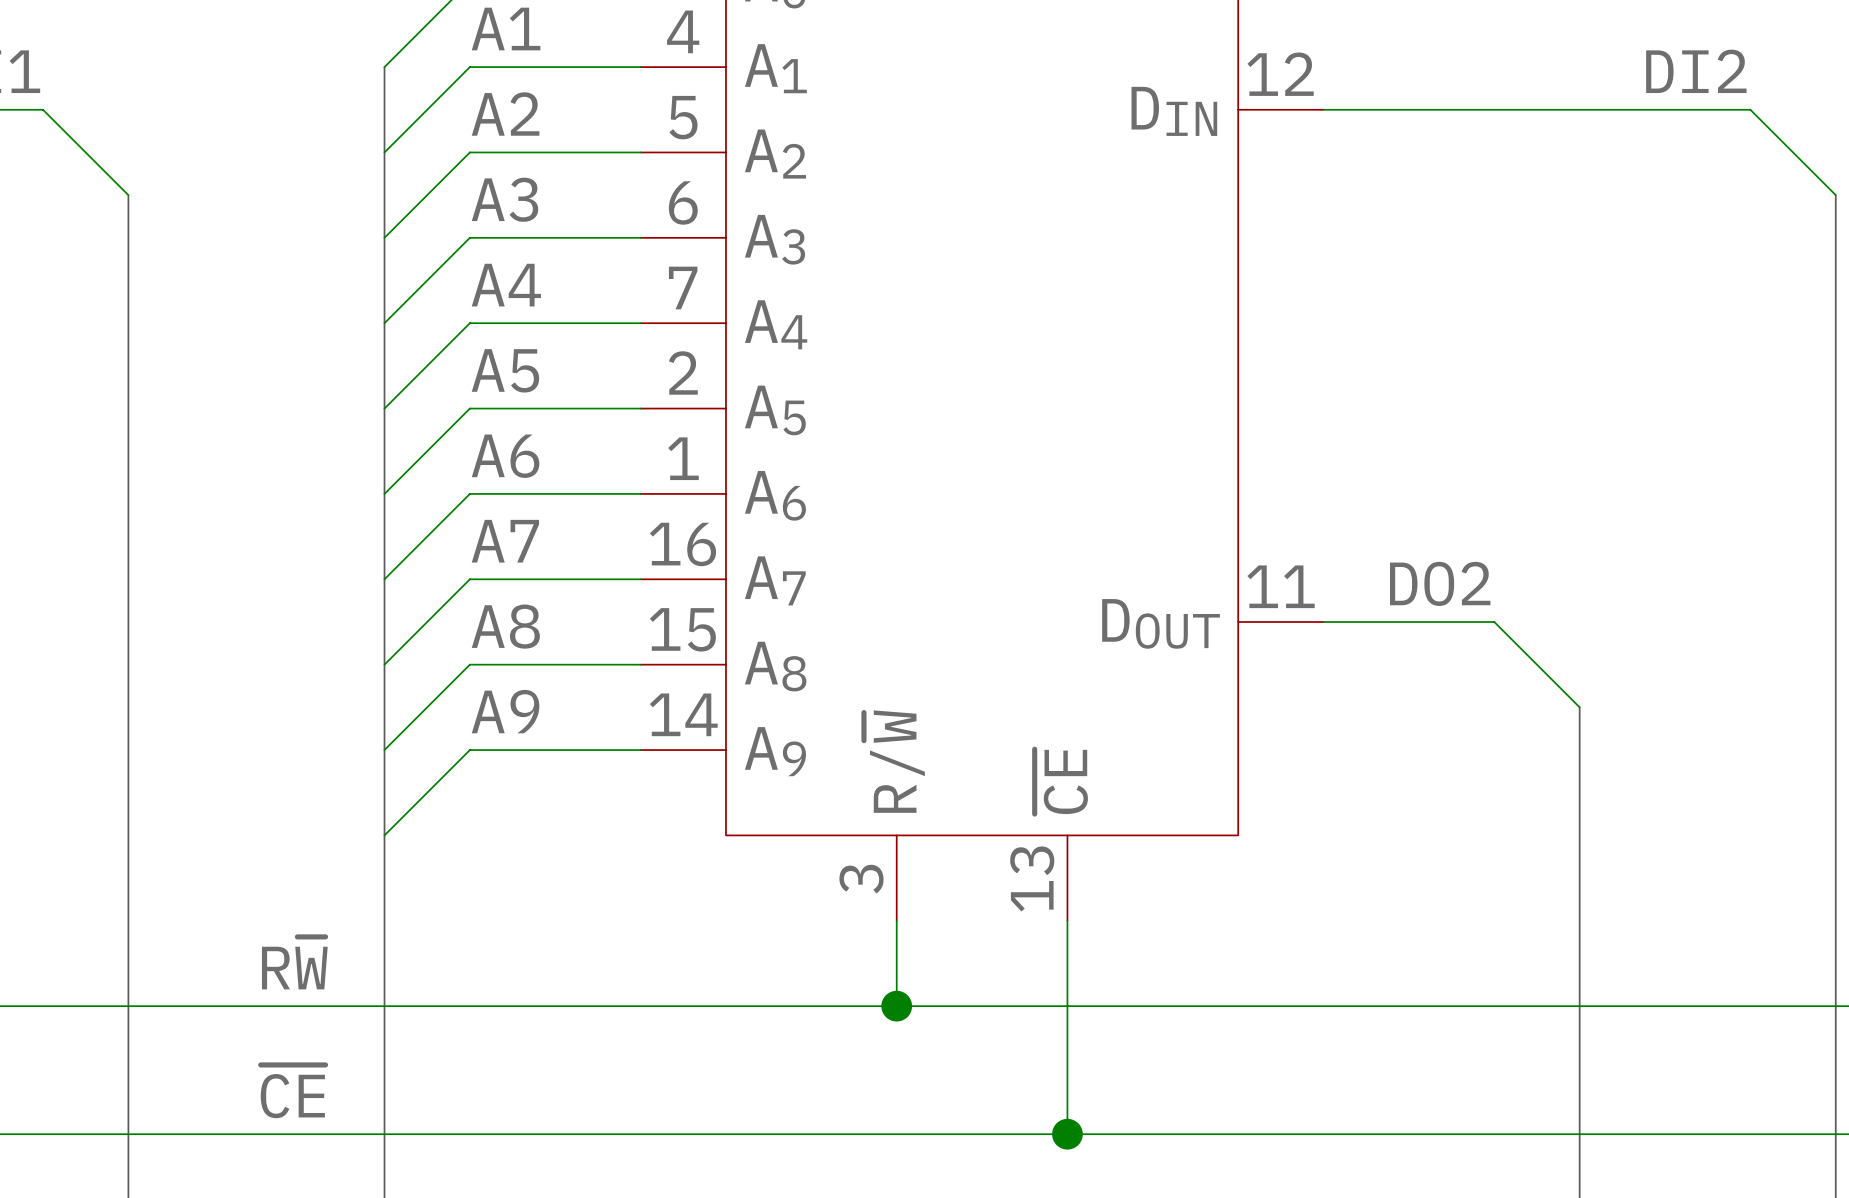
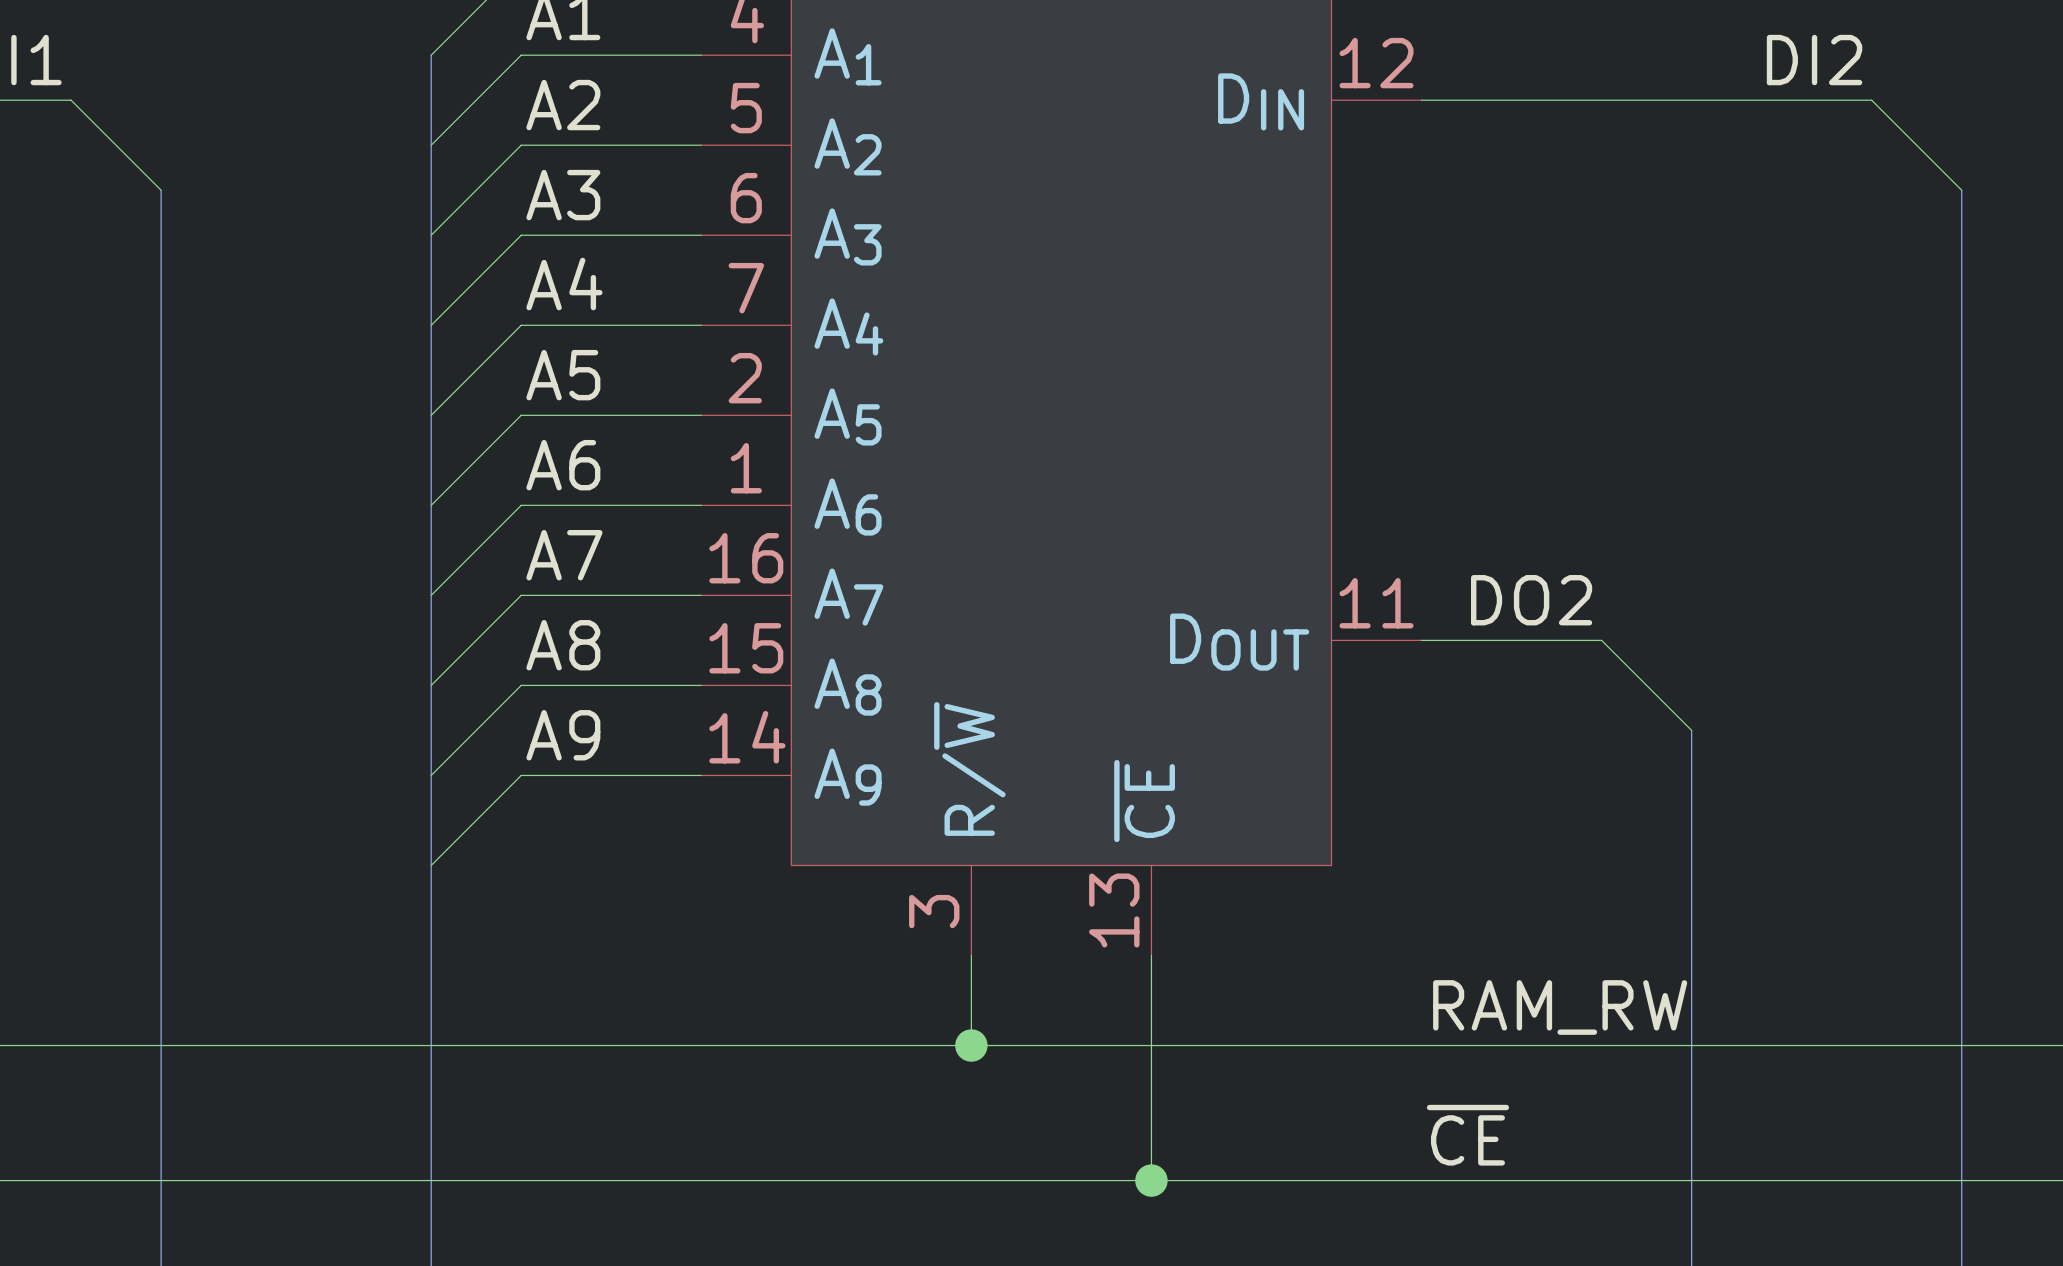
label: R~{W} (294, 963) -> none
label: none -> RAM_RW (1560, 1007)
label: ~{CE} (293, 1091) -> none
label: none -> ~{CE} (1467, 1135)

